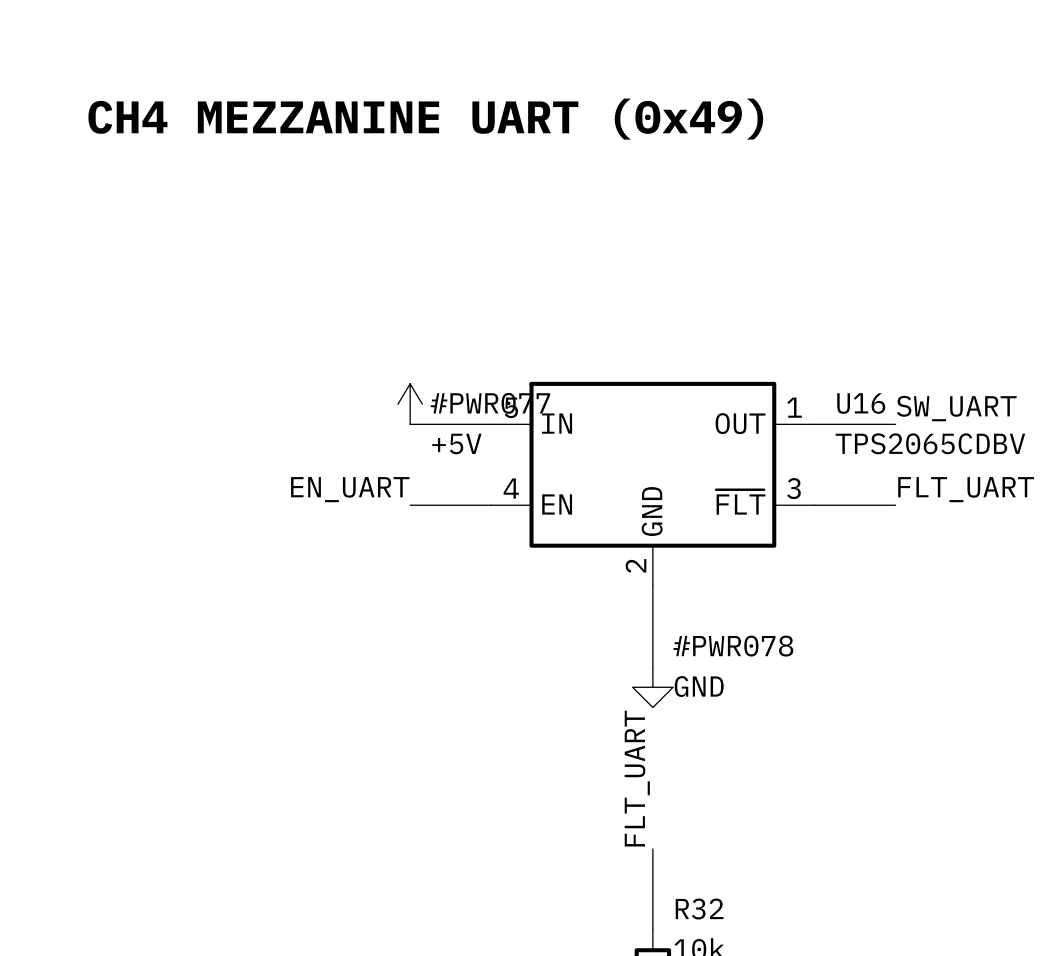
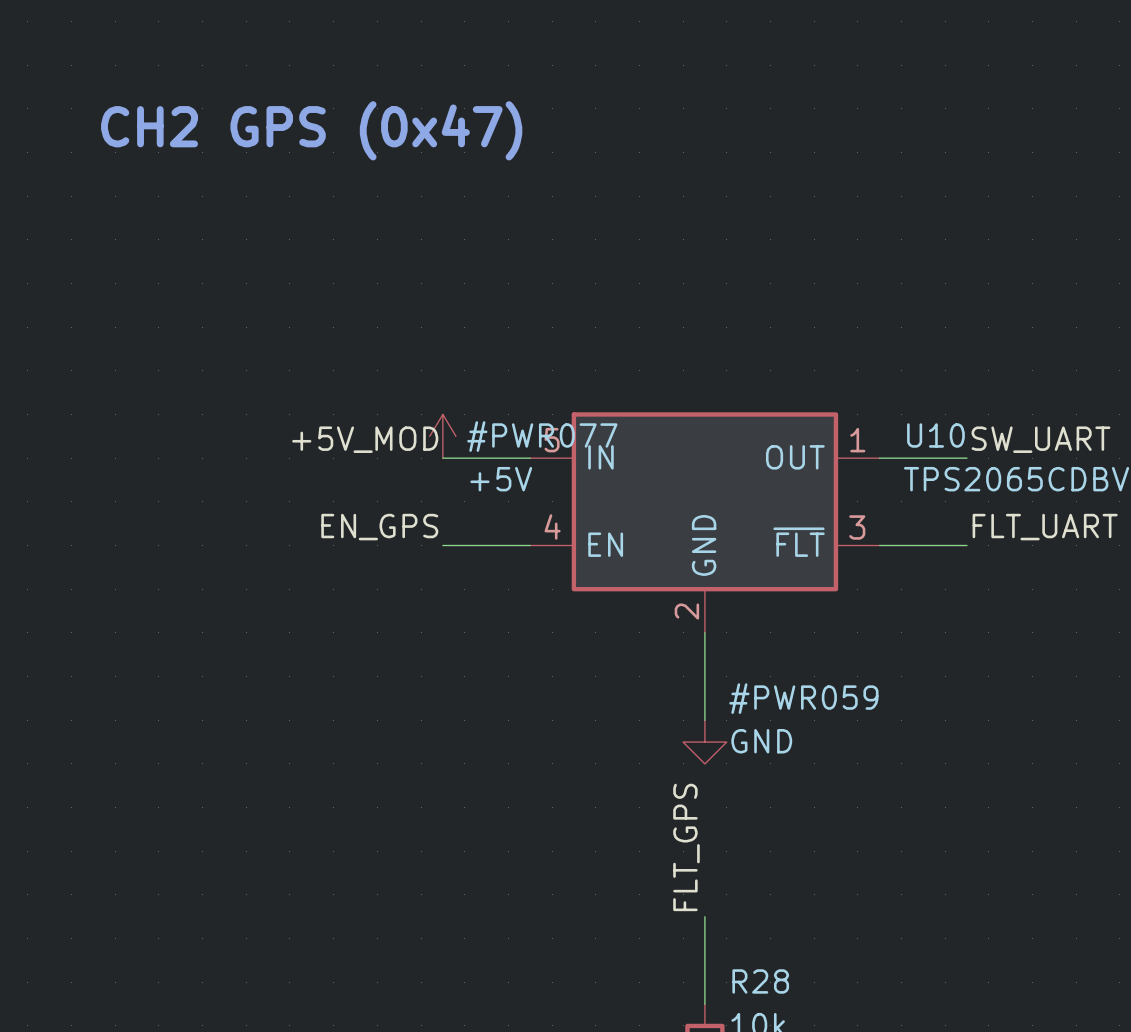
text: CH4 MEZZANINE UART (0x49) (425, 119) -> CH2 GPS (0x47) (311, 130)
U16 name: U16 (861, 403) -> U10 (935, 435)
label: none -> +5V_MOD (365, 439)
label: EN_UART (350, 489) -> EN_GPS (379, 527)
#PWR078 name: #PWR078 (733, 646) -> #PWR059 (803, 698)
label: FLT_UART (637, 778) -> FLT_GPS (686, 847)
R32 name: R32 (699, 909) -> R28 (760, 981)

